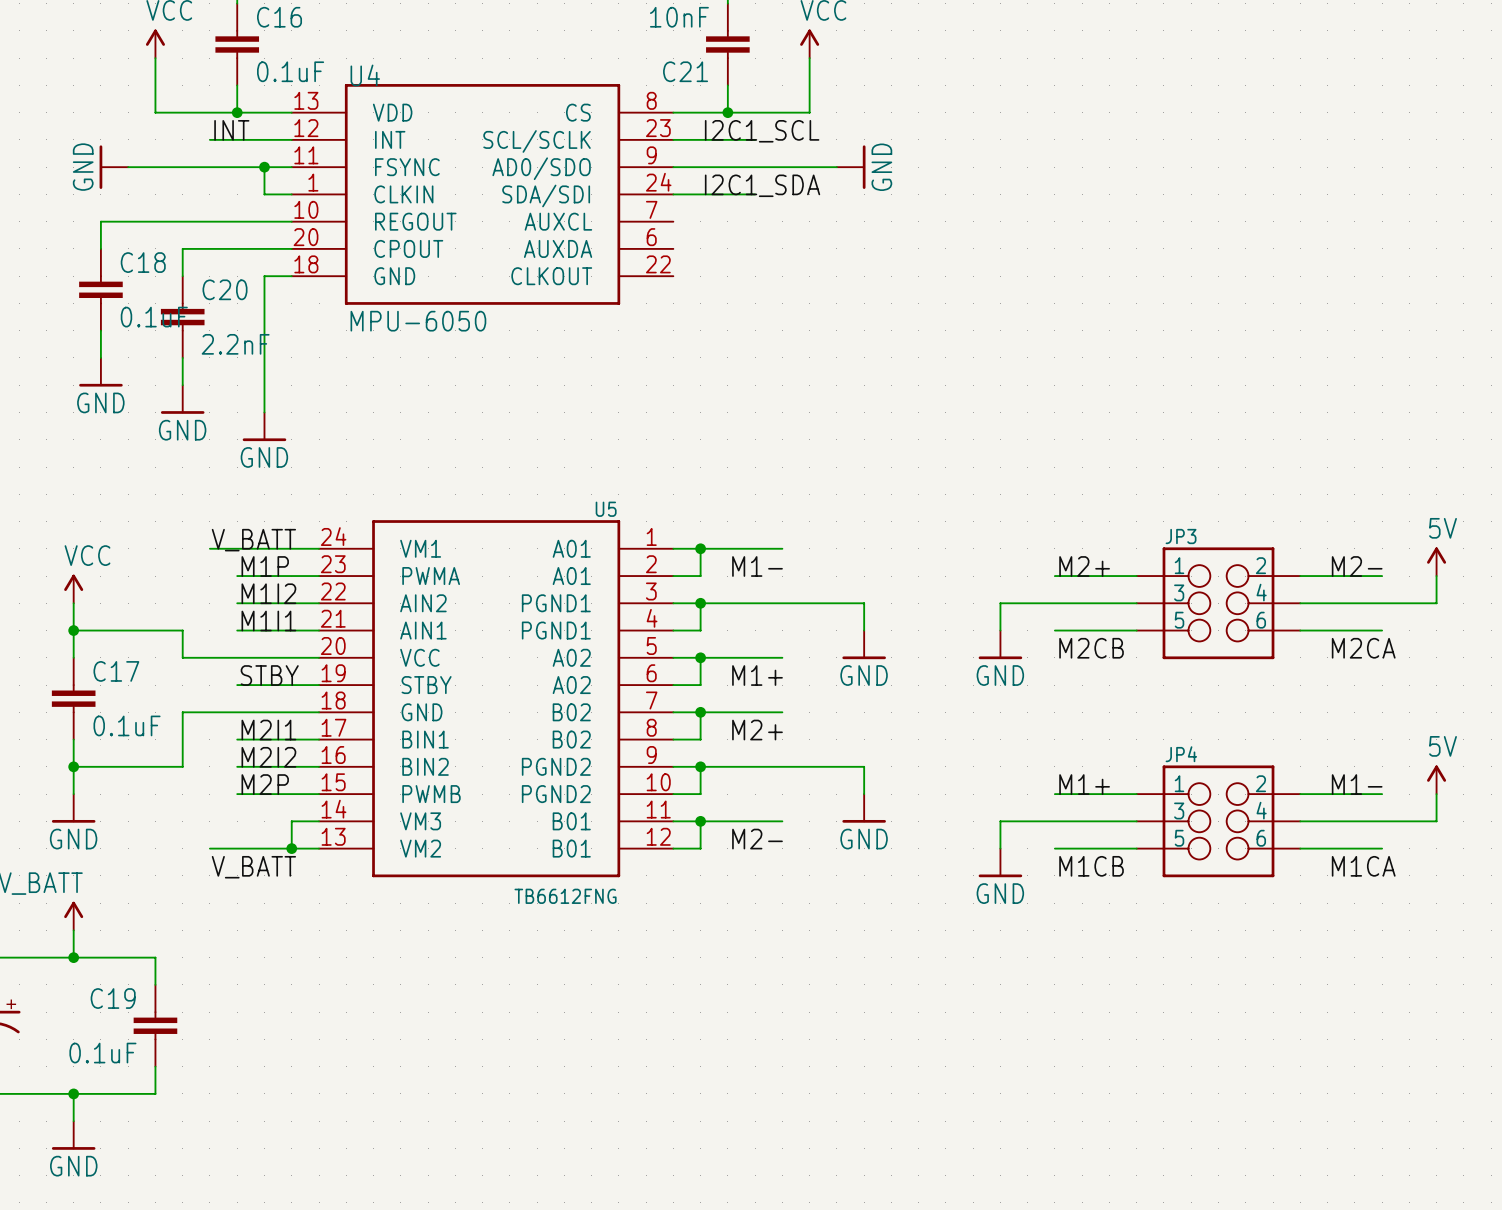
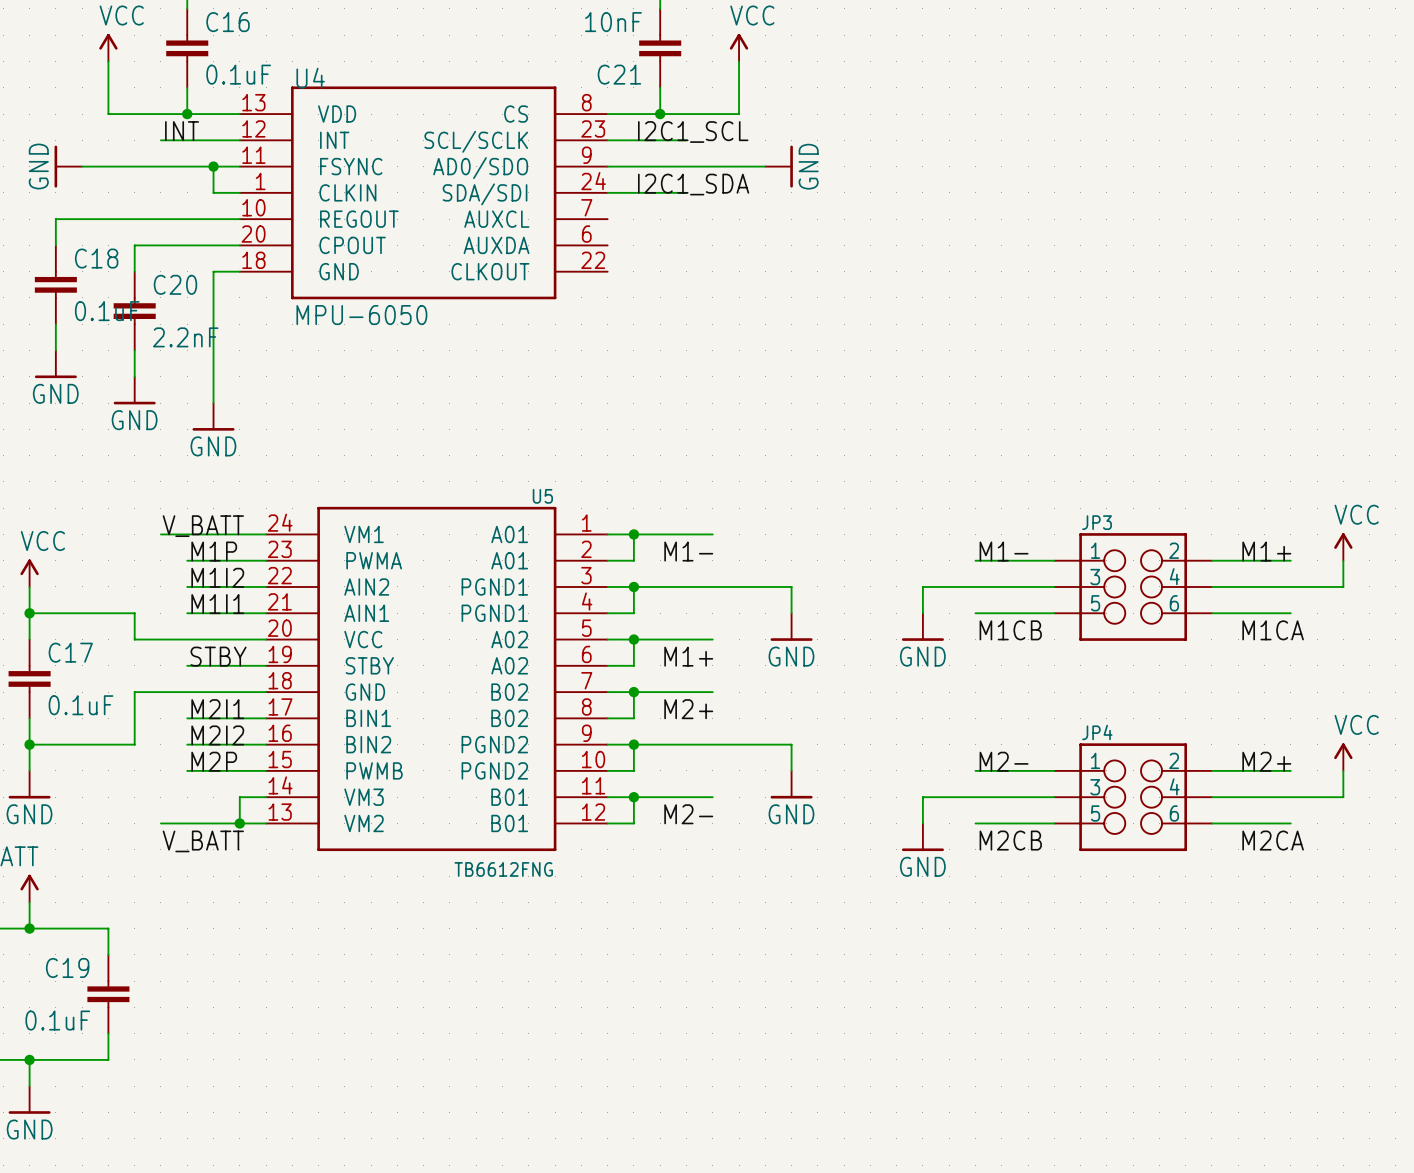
power symbol: 5V (1436, 561) -> VCC (1343, 546)
label: M2+ (1084, 566) -> M1- (1004, 551)
label: M2- (1357, 566) -> M1+ (1266, 551)
label: M2CB (1091, 648) -> M1CB (1010, 630)
label: M2CA (1363, 648) -> M1CA (1273, 630)
power symbol: 5V (1436, 779) -> VCC (1343, 757)
label: M1+ (1084, 784) -> M2- (1004, 761)
label: M1- (1357, 784) -> M2+ (1266, 761)
label: M1CB (1091, 866) -> M2CB (1010, 840)
label: M1CA (1363, 866) -> M2CA (1273, 840)

